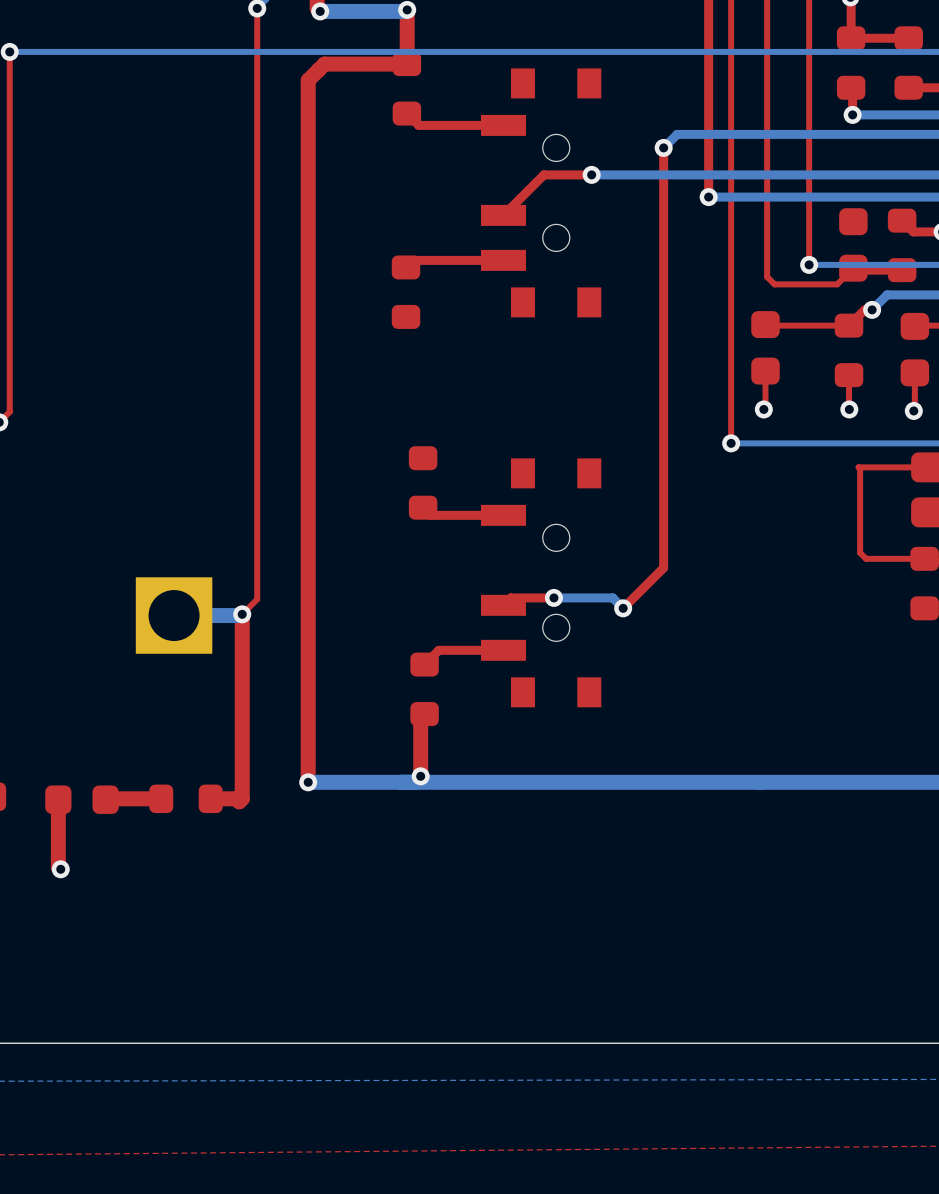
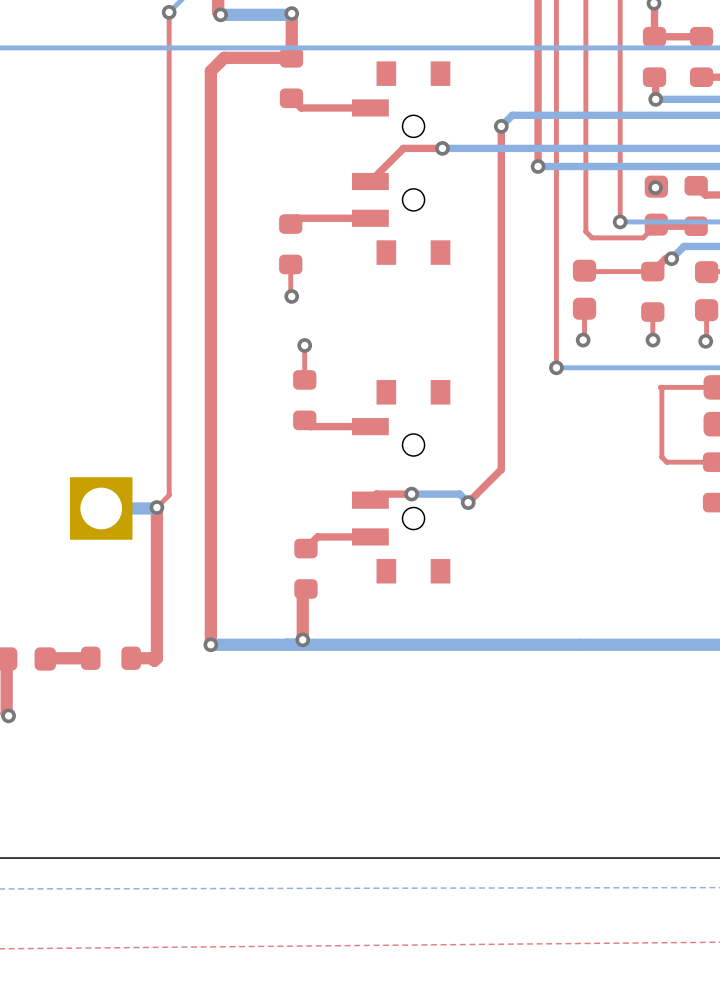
via: none -> (655, 187)
top track: none -> (290, 264) (291, 296)
via: none -> (291, 296)
top track: none -> (304, 345) (304, 379)
via: none -> (304, 345)

